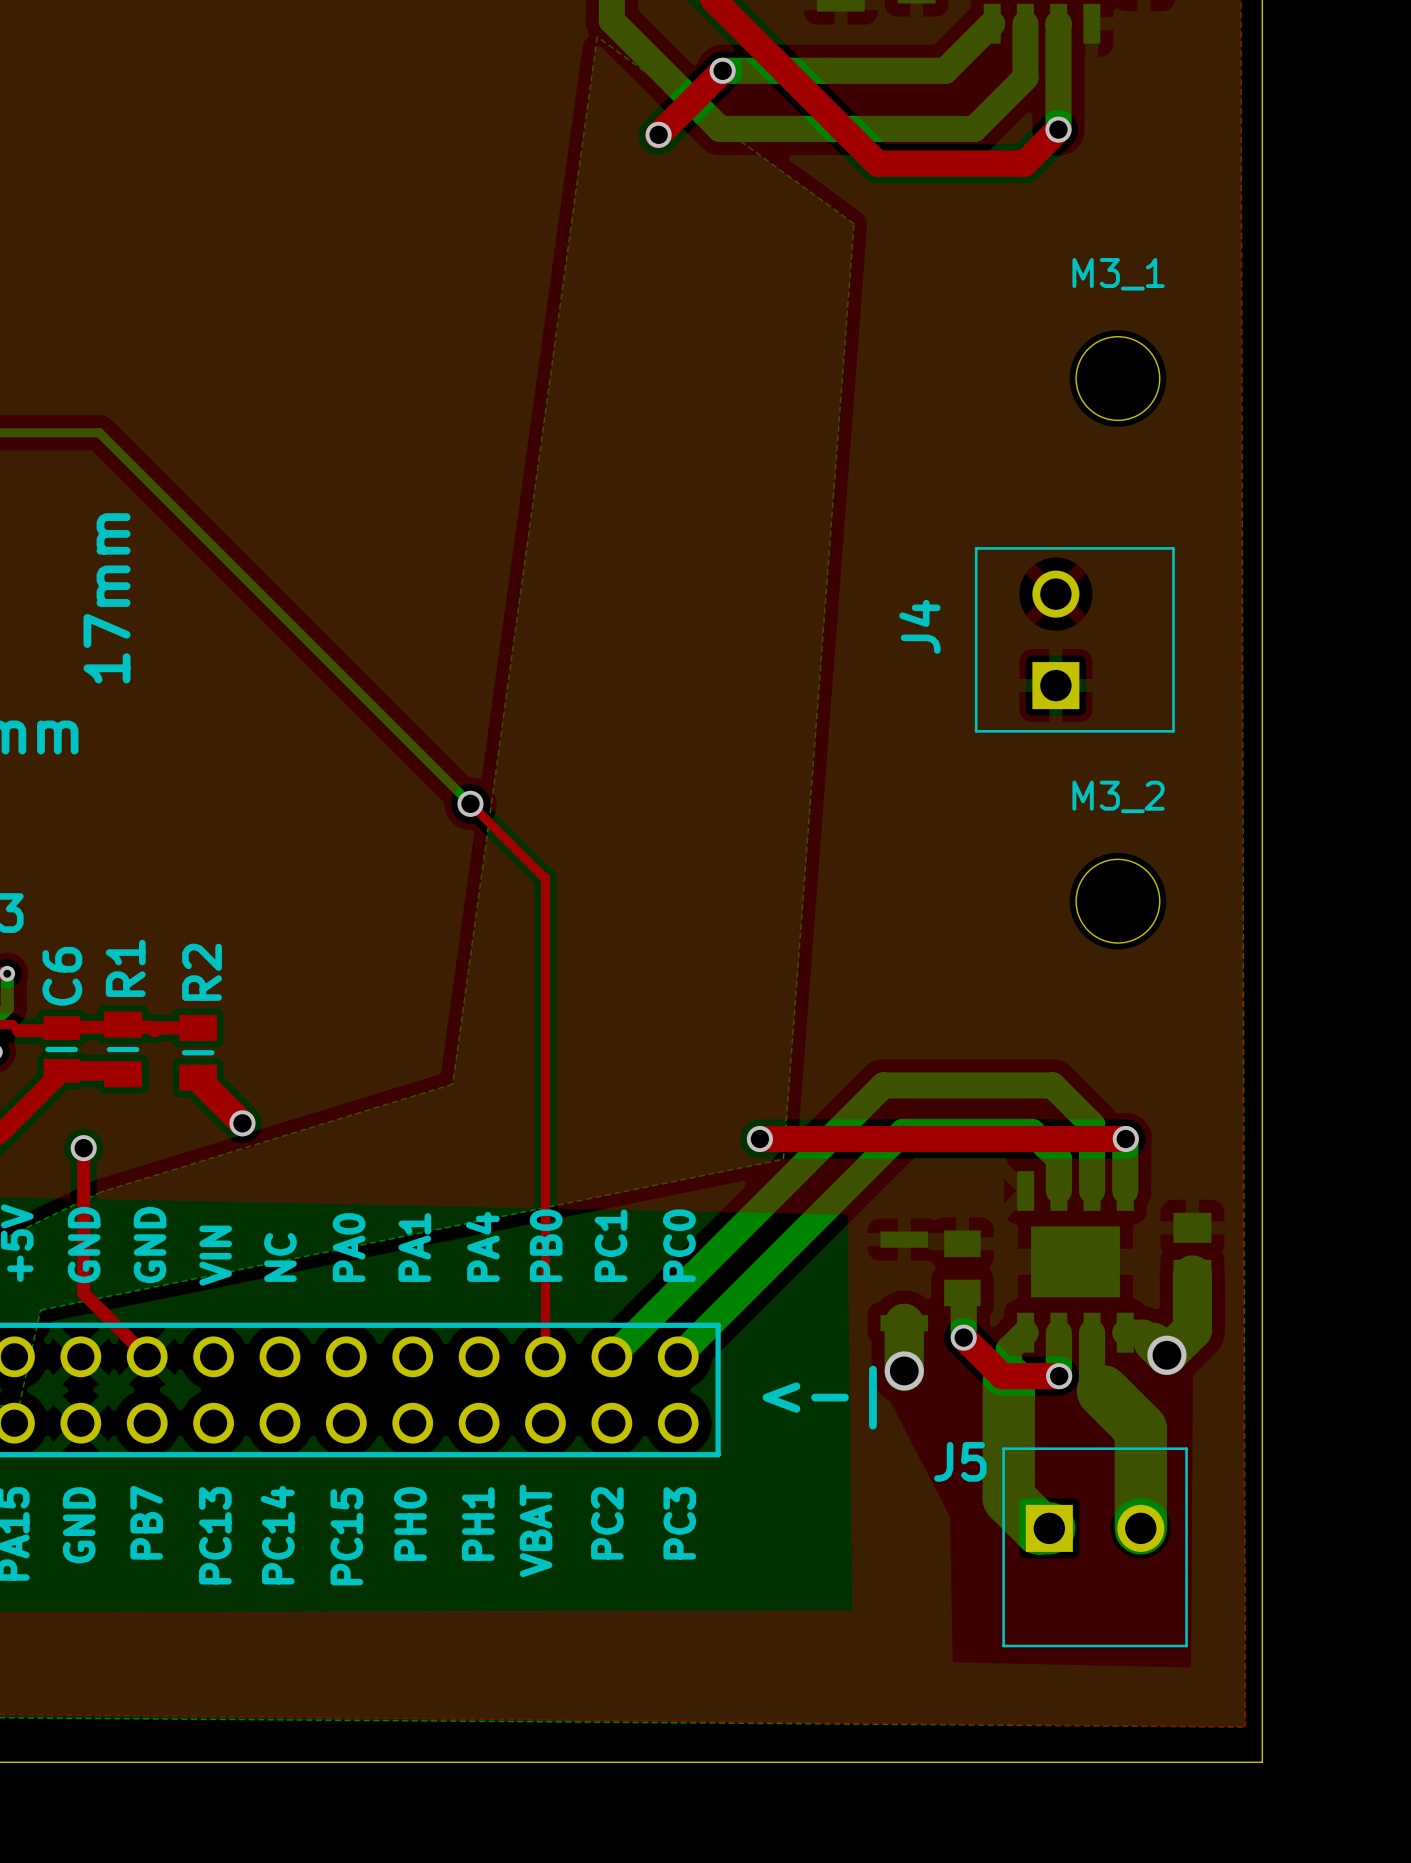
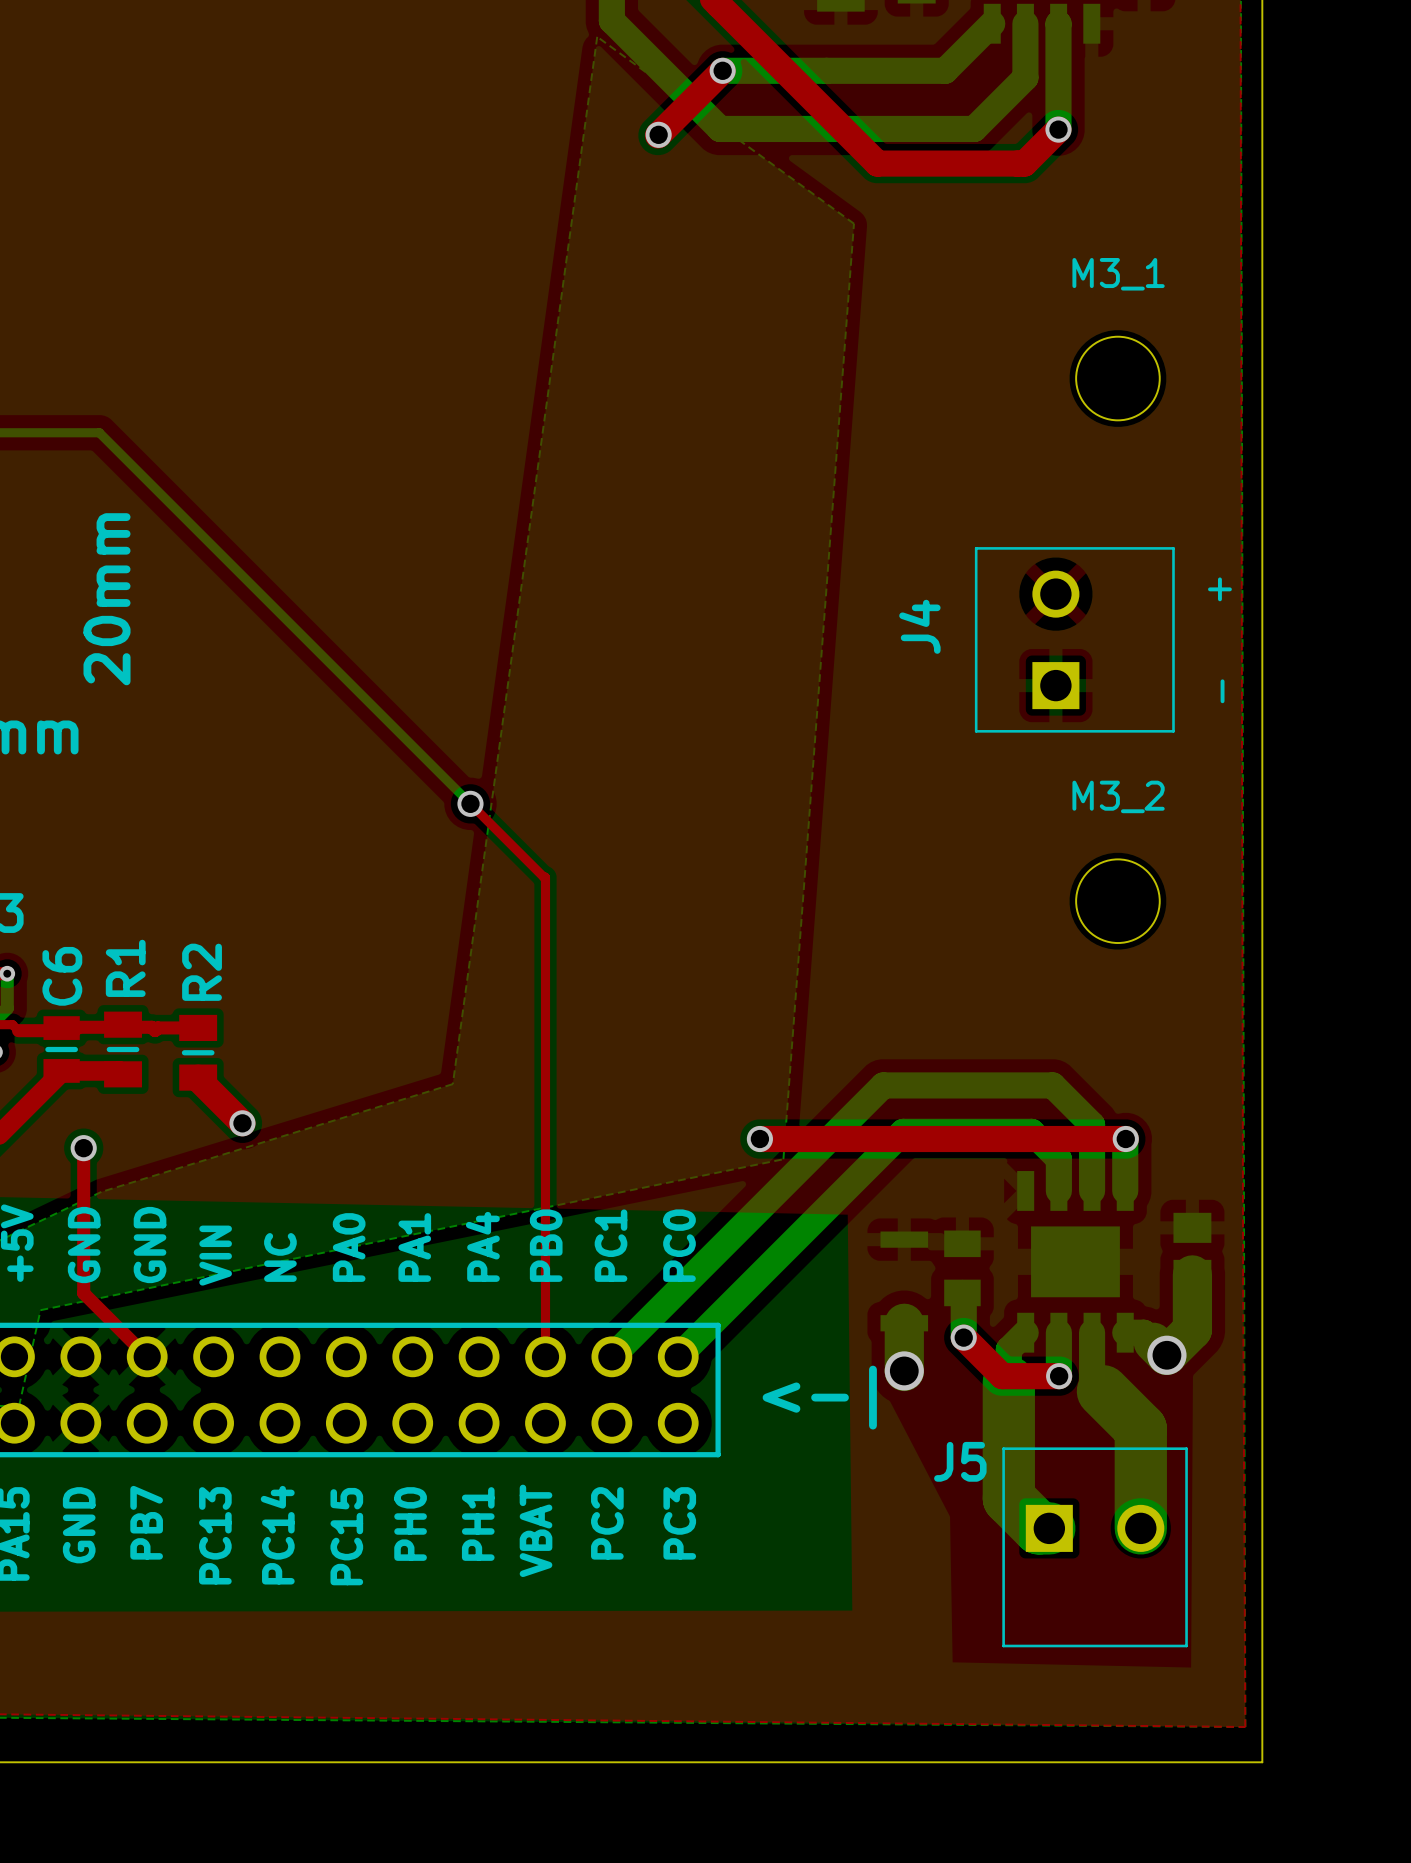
text: none -> + (1219, 589)
text: 17mm (107, 598) -> 20mm (107, 599)
text: none -> - (1222, 691)

